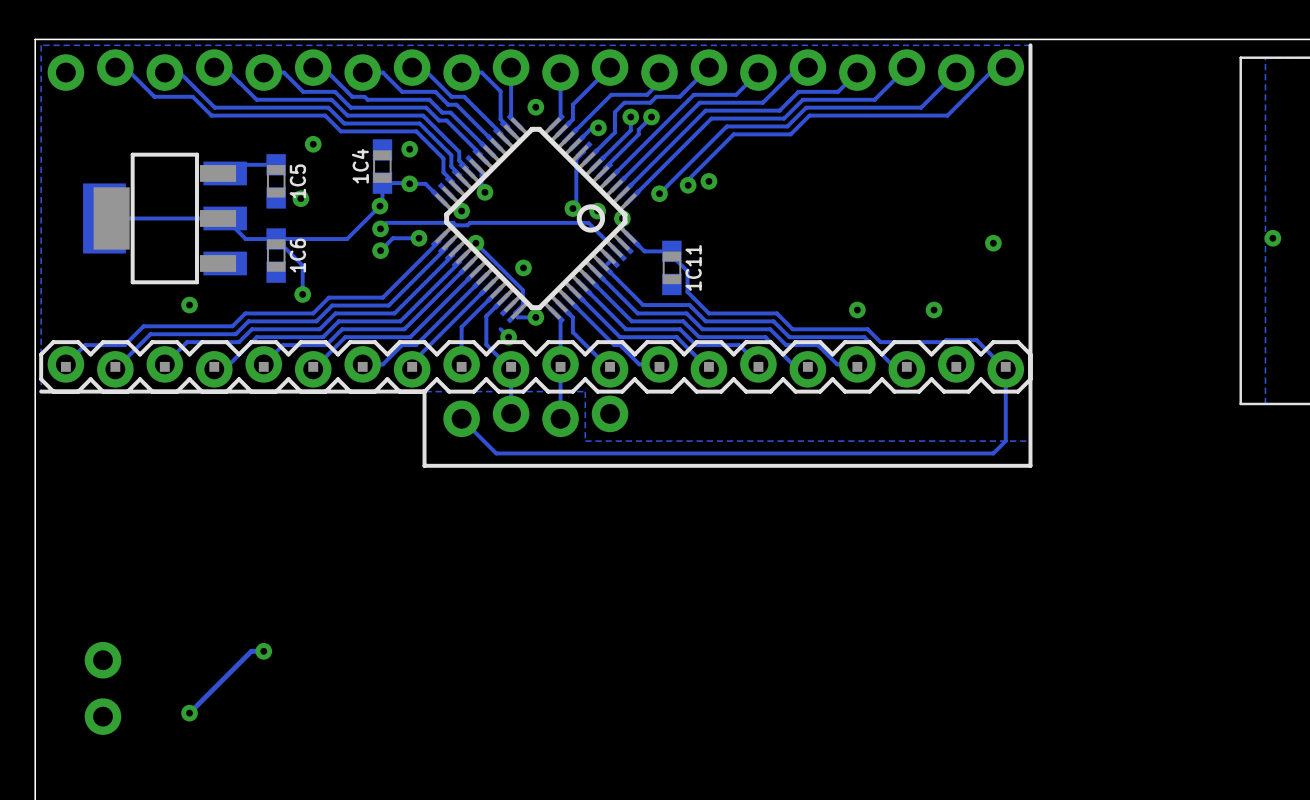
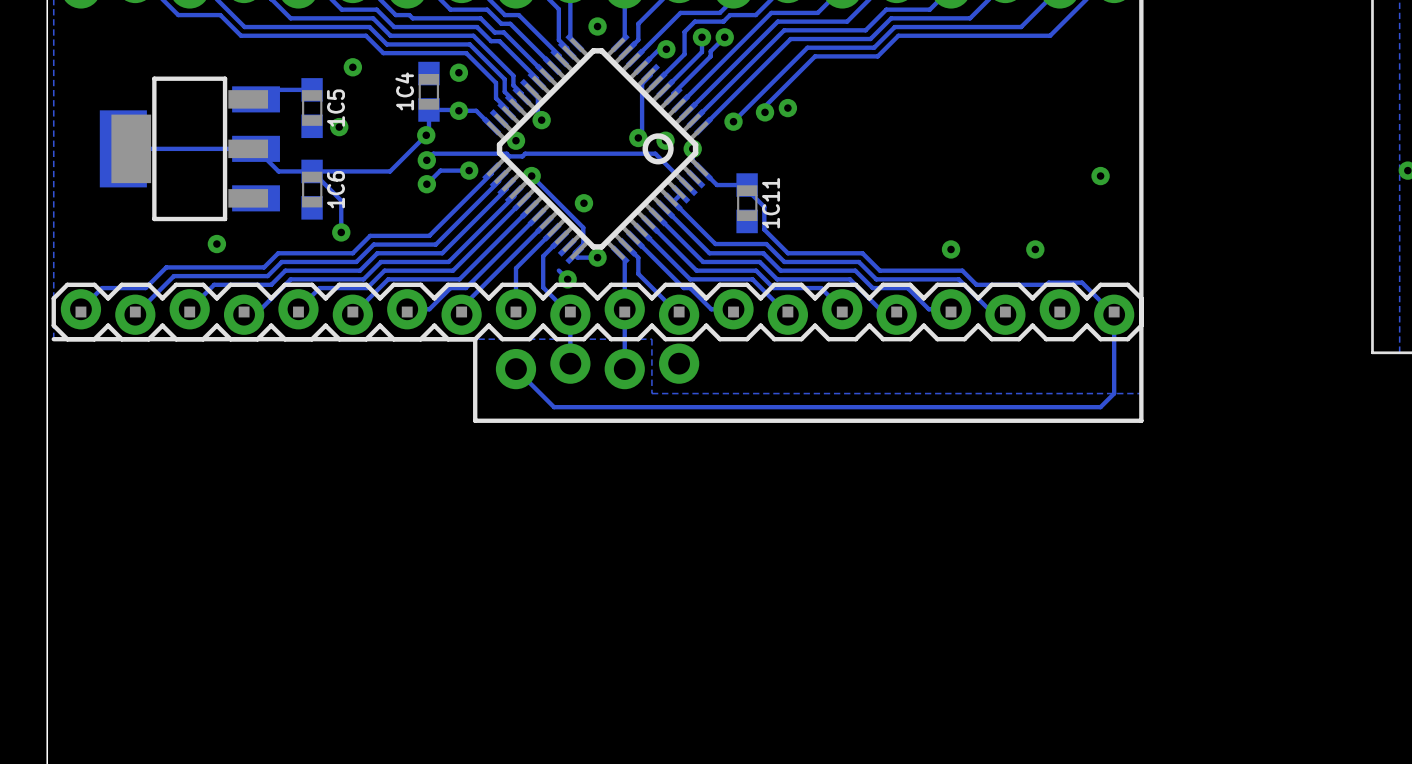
track: (263, 651) (251, 651) (189, 713) -> none
via: (263, 651) -> none
part: (102, 688) -> none
via: (189, 713) -> none

